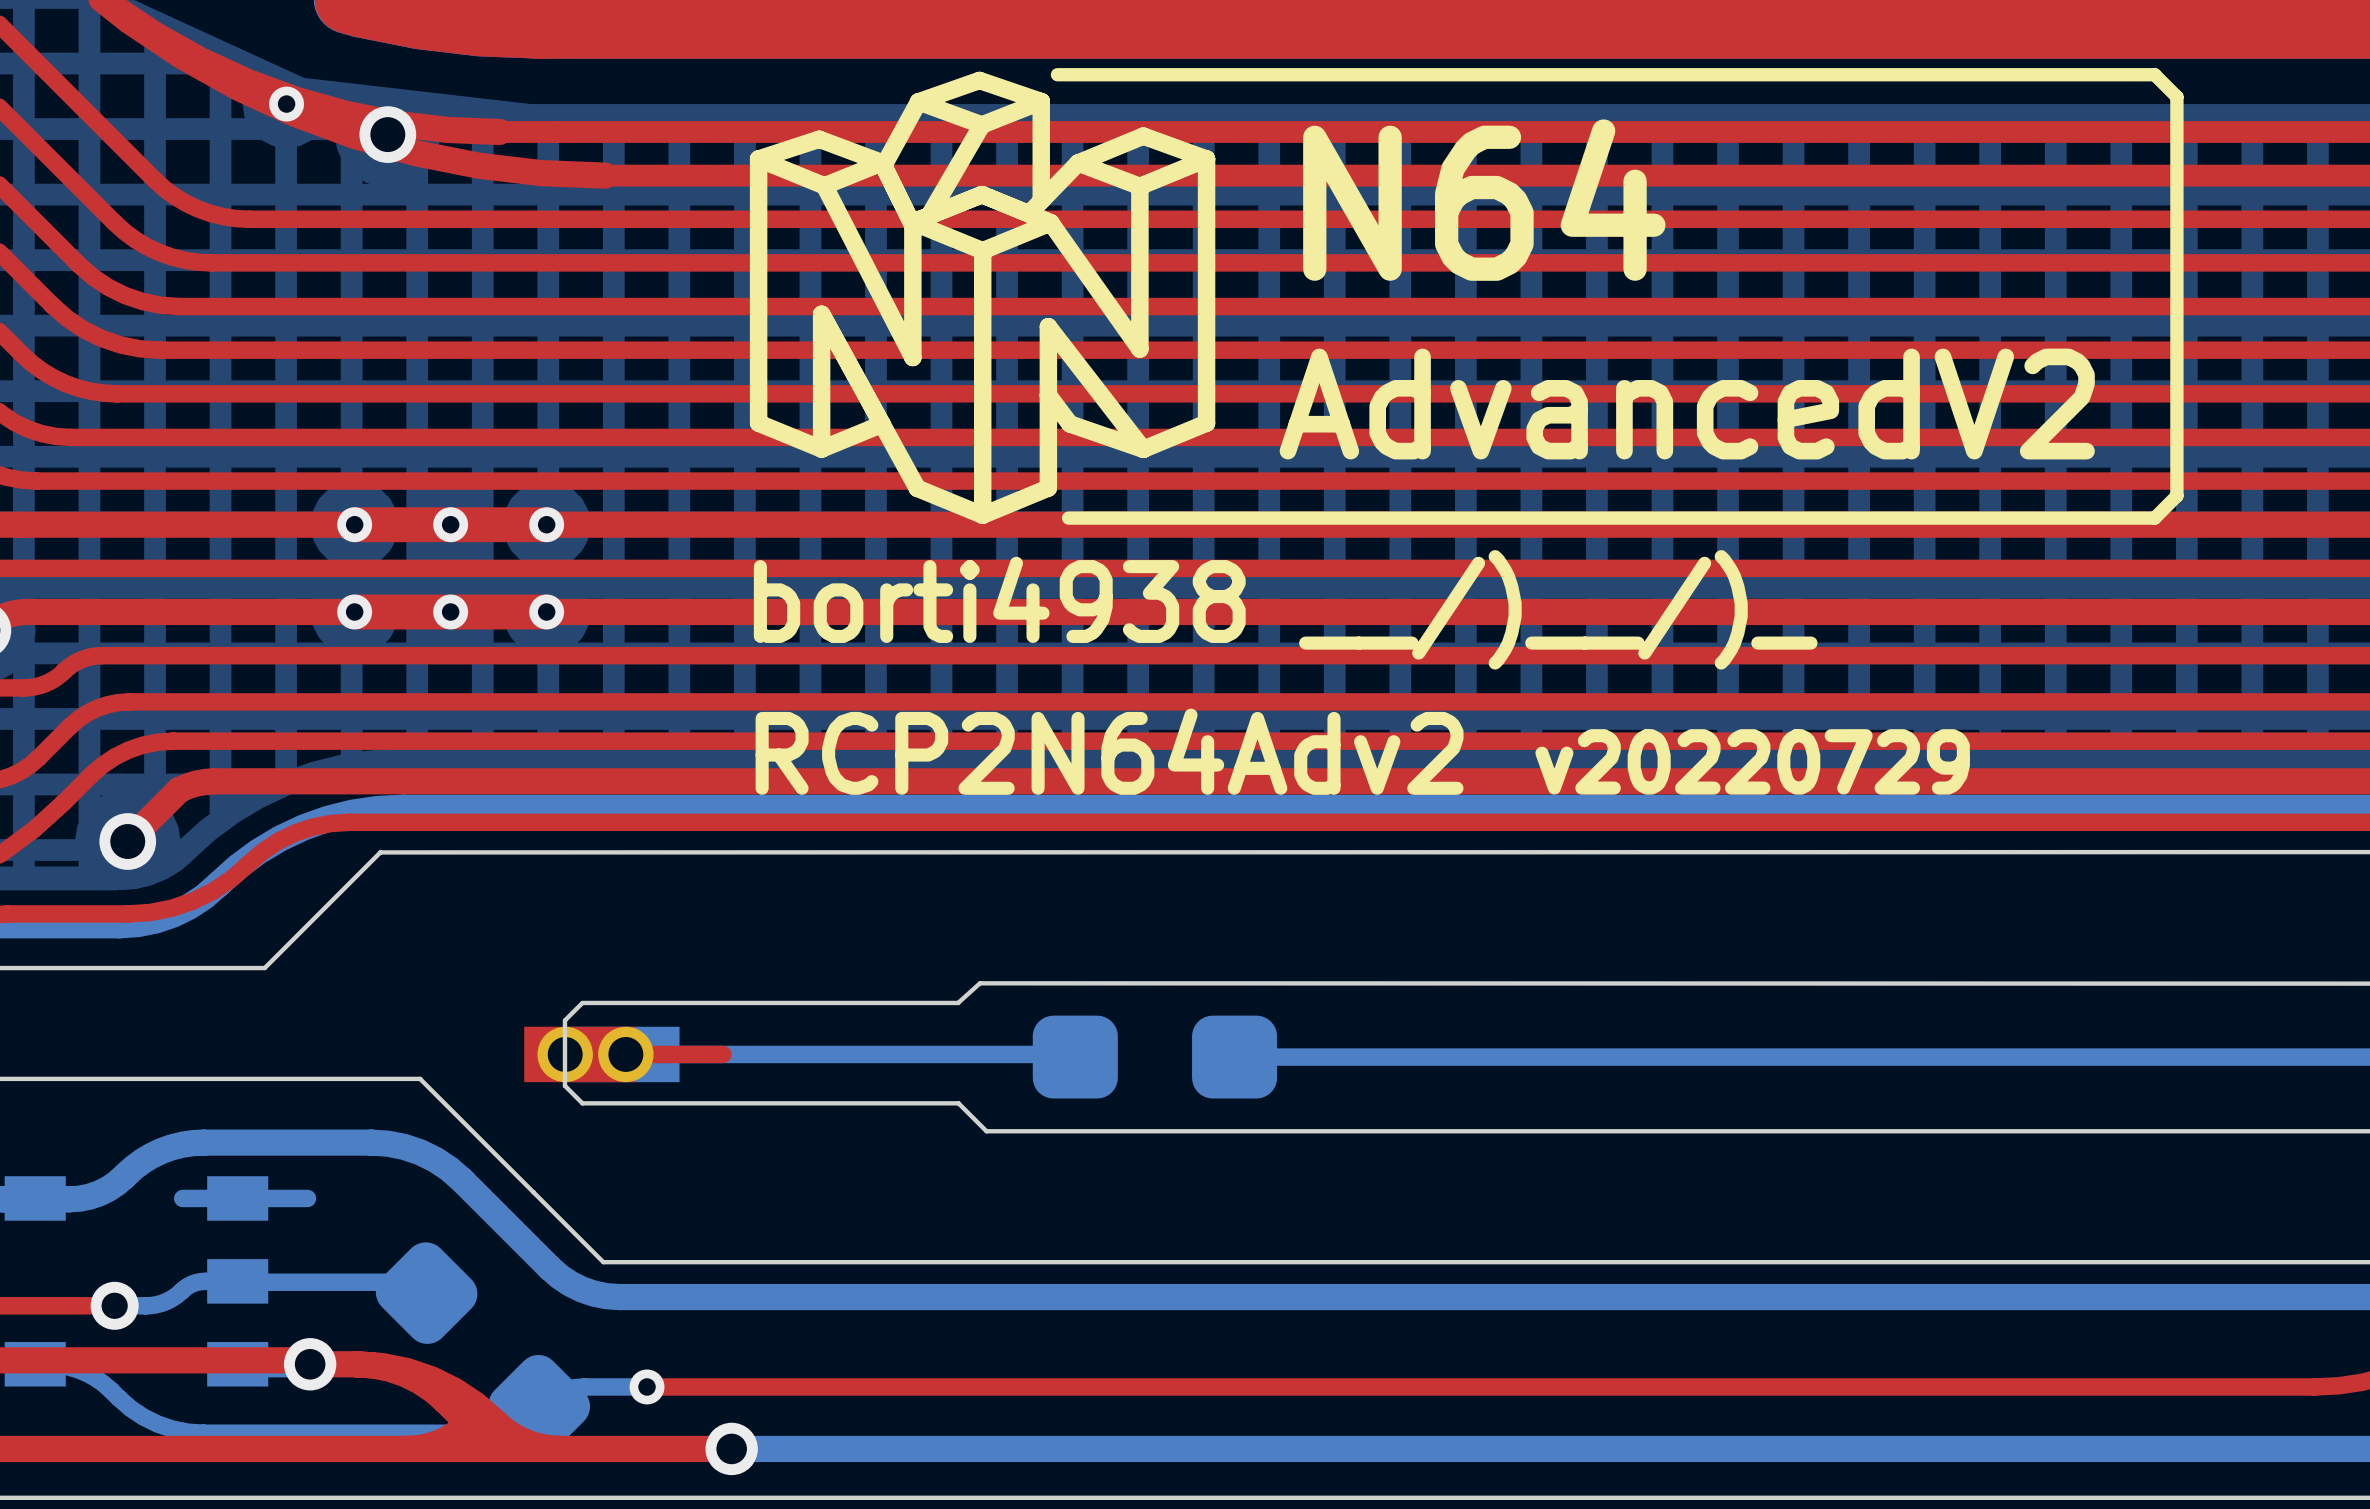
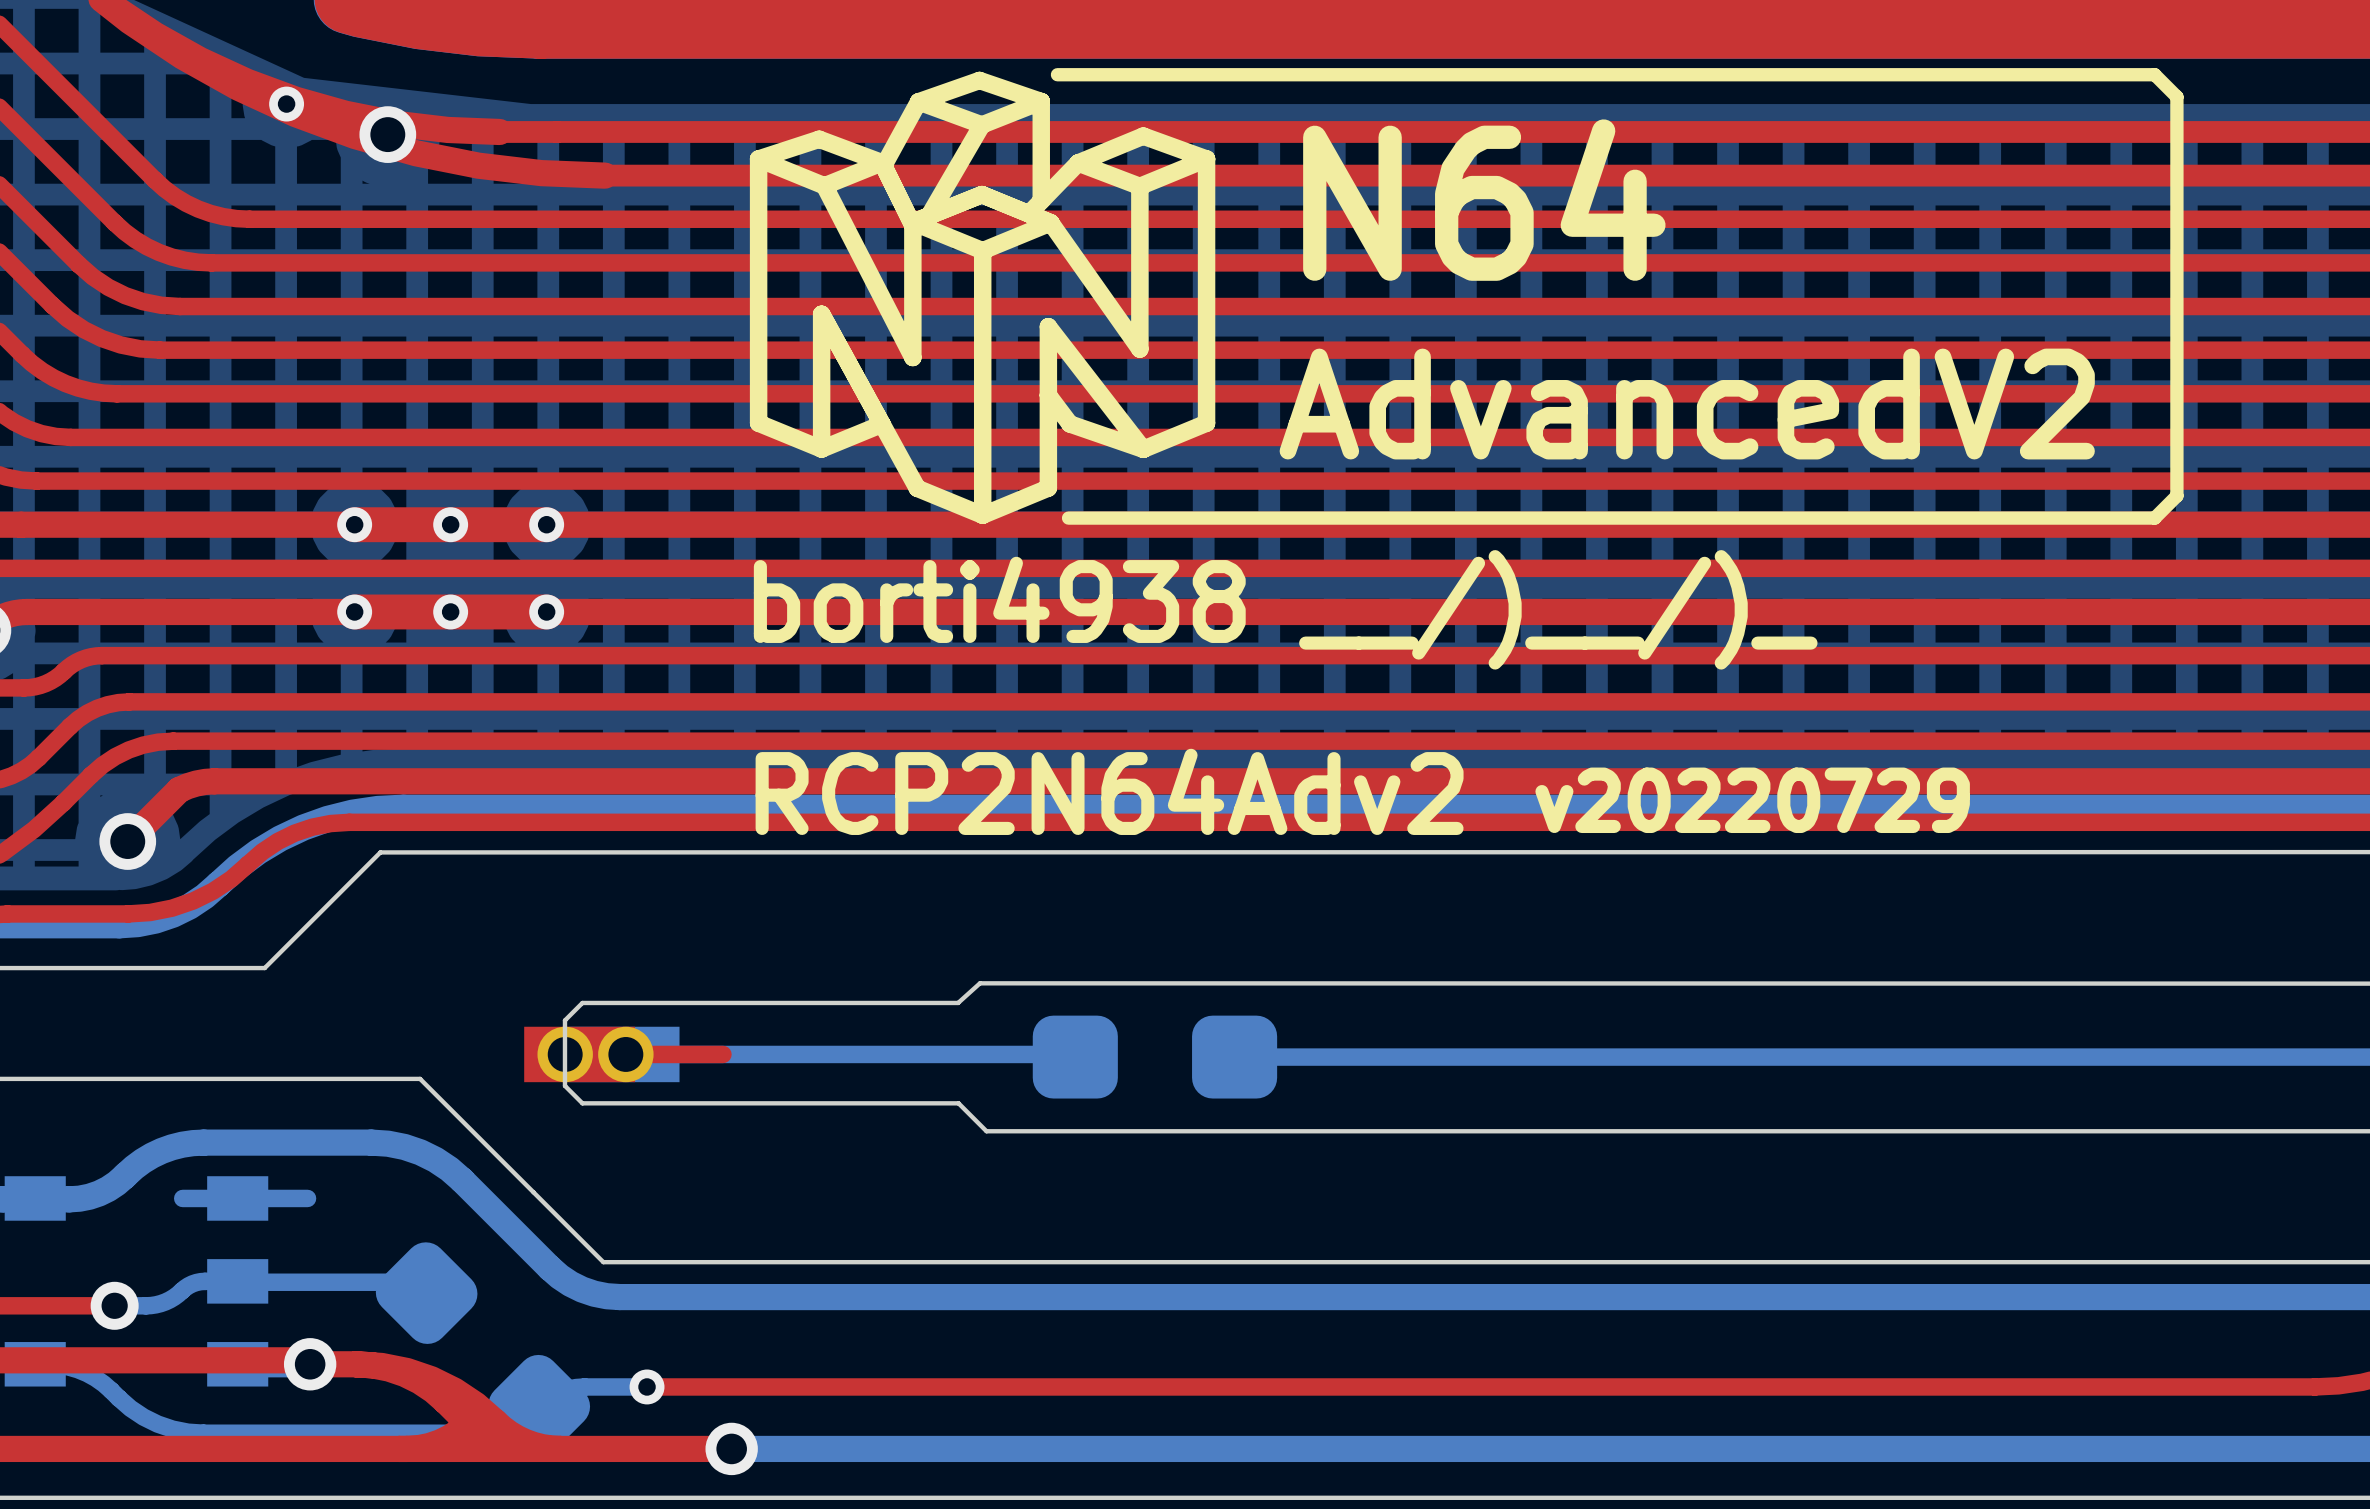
text position: RCP2N64Adv2 (1109, 751) -> RCP2N64Adv2 (1109, 791)
text position: v20220729 (1752, 761) -> v20220729 (1752, 800)

